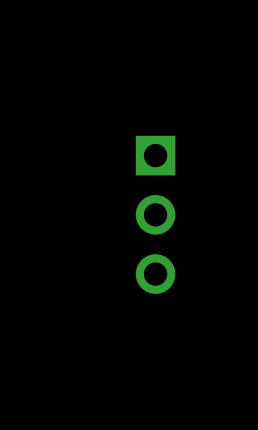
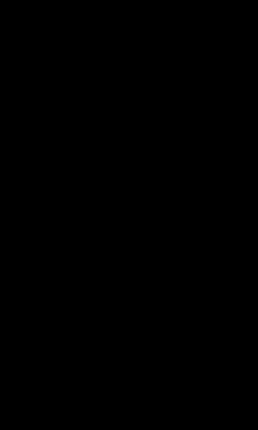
part: (155, 214) -> none

